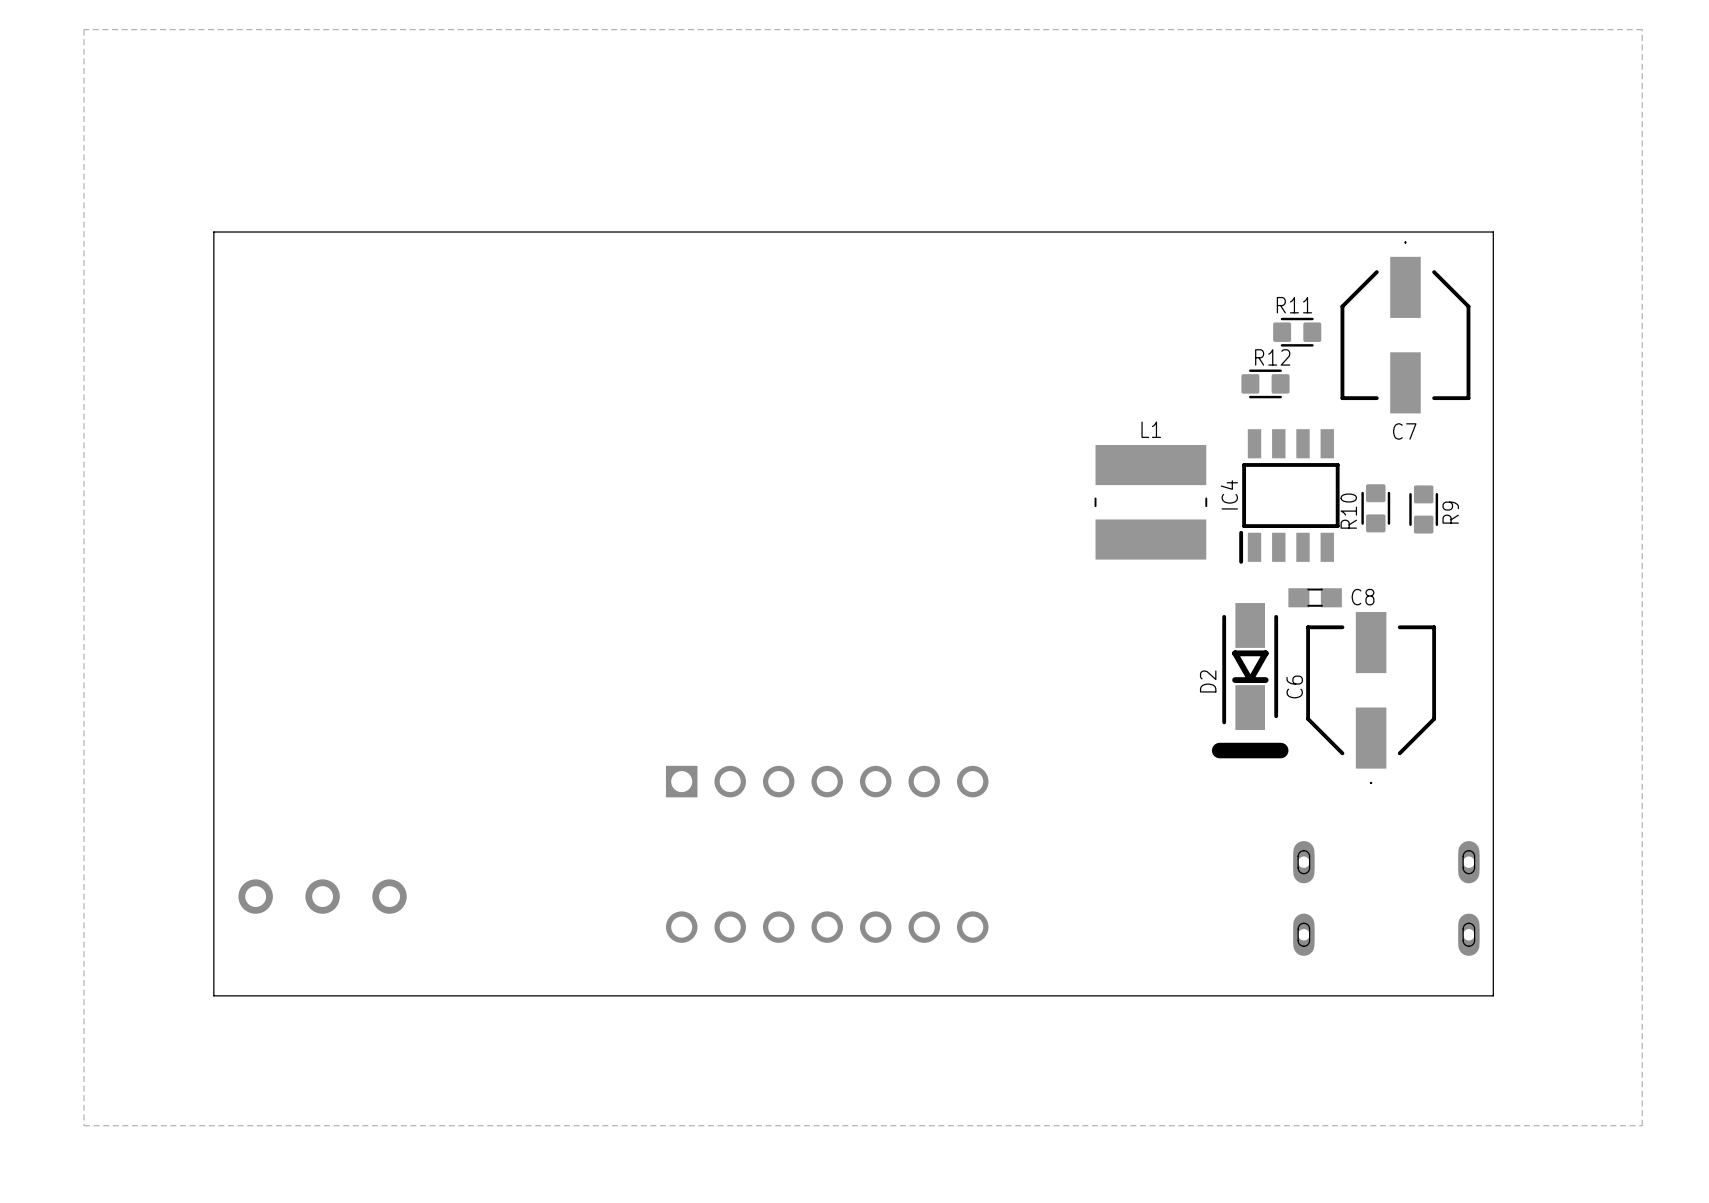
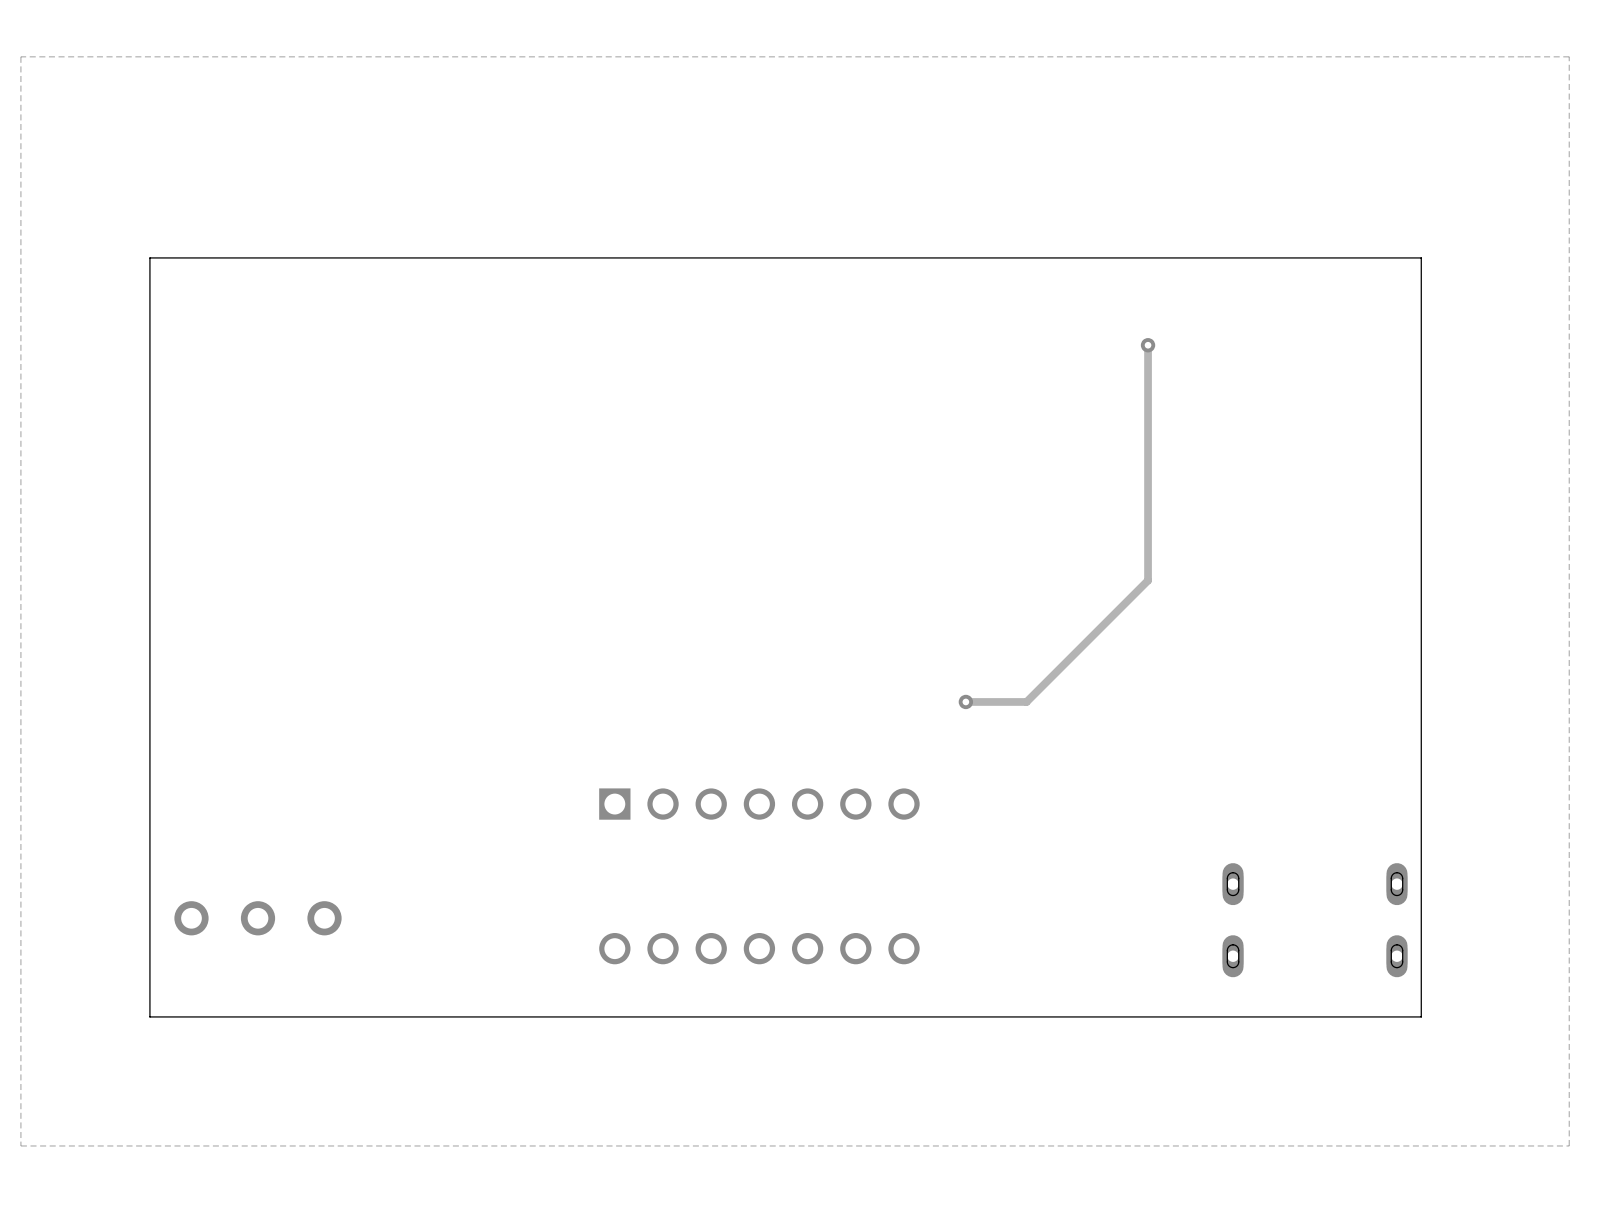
track: none -> (1148, 345) (1148, 580) (1026, 701) (965, 701)
via: none -> (1148, 345)
C7: (1405, 327) -> none
R11: (1297, 332) -> none
R12: (1265, 383) -> none
IC4: (1289, 496) -> none
L1: (1150, 502) -> none
R10: (1375, 508) -> none
R9: (1423, 509) -> none
C8: (1315, 597) -> none
via: none -> (965, 701)
D2: (1250, 680) -> none
C6: (1371, 697) -> none

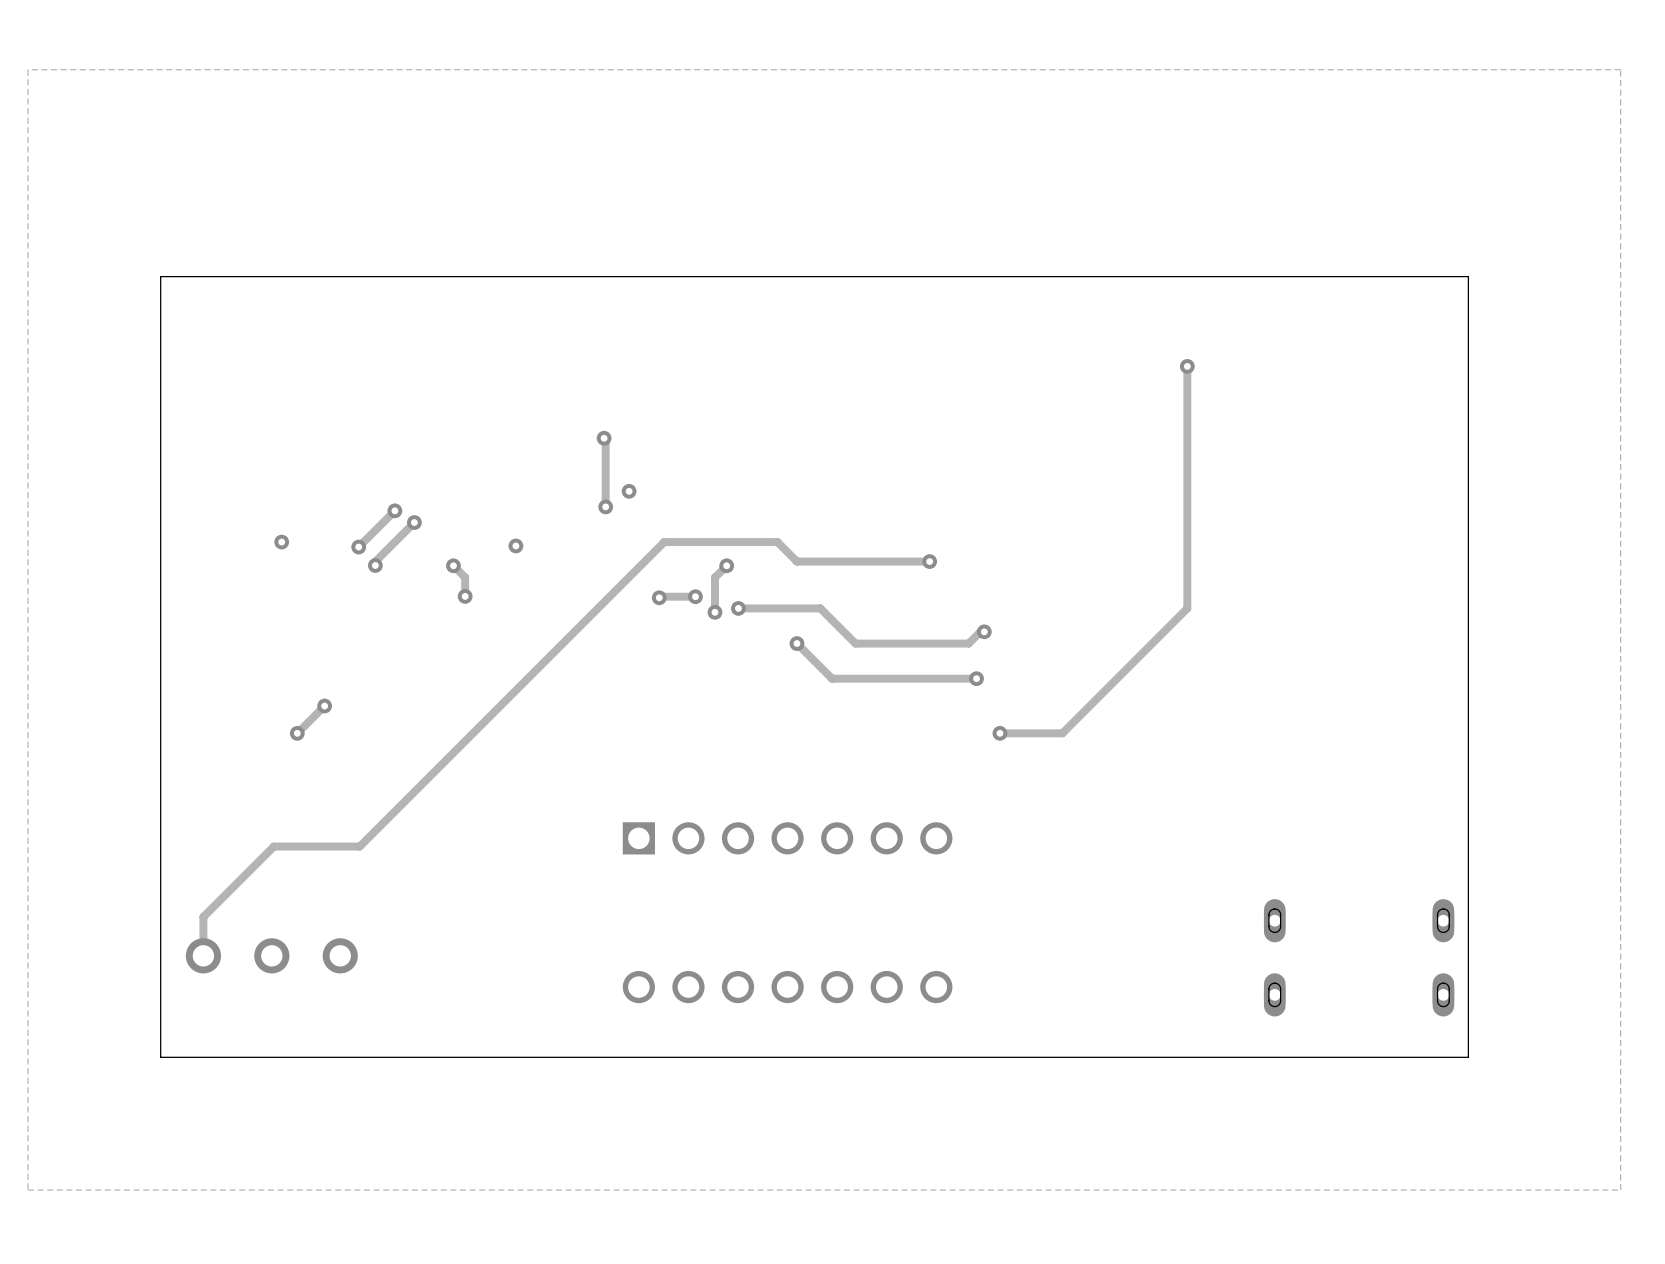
track: none -> (604, 438) (605, 439) (605, 506)
via: none -> (604, 438)
via: none -> (629, 491)
via: none -> (605, 506)
track: none -> (394, 510) (358, 547)
via: none -> (394, 510)
track: none -> (414, 522) (375, 561) (375, 565)
via: none -> (414, 522)
via: none -> (281, 542)
via: none -> (515, 545)
via: none -> (358, 547)
track: none -> (929, 561) (796, 561) (777, 542) (664, 542) (359, 846) (273, 846) (203, 917) (203, 955)
via: none -> (929, 561)
via: none -> (375, 565)
track: none -> (453, 565) (465, 577) (465, 596)
via: none -> (453, 565)
track: none -> (726, 565) (714, 577) (714, 612)
via: none -> (726, 565)
via: none -> (465, 596)
track: none -> (695, 596) (659, 597)
via: none -> (695, 596)
via: none -> (659, 597)
track: none -> (738, 608) (820, 608) (855, 643) (968, 643) (980, 631) (984, 631)
via: none -> (738, 608)
via: none -> (714, 612)
via: none -> (984, 631)
track: none -> (796, 643) (832, 678) (976, 678)
via: none -> (796, 643)
via: none -> (976, 678)
track: none -> (324, 706) (297, 733)
via: none -> (324, 706)
via: none -> (297, 733)

